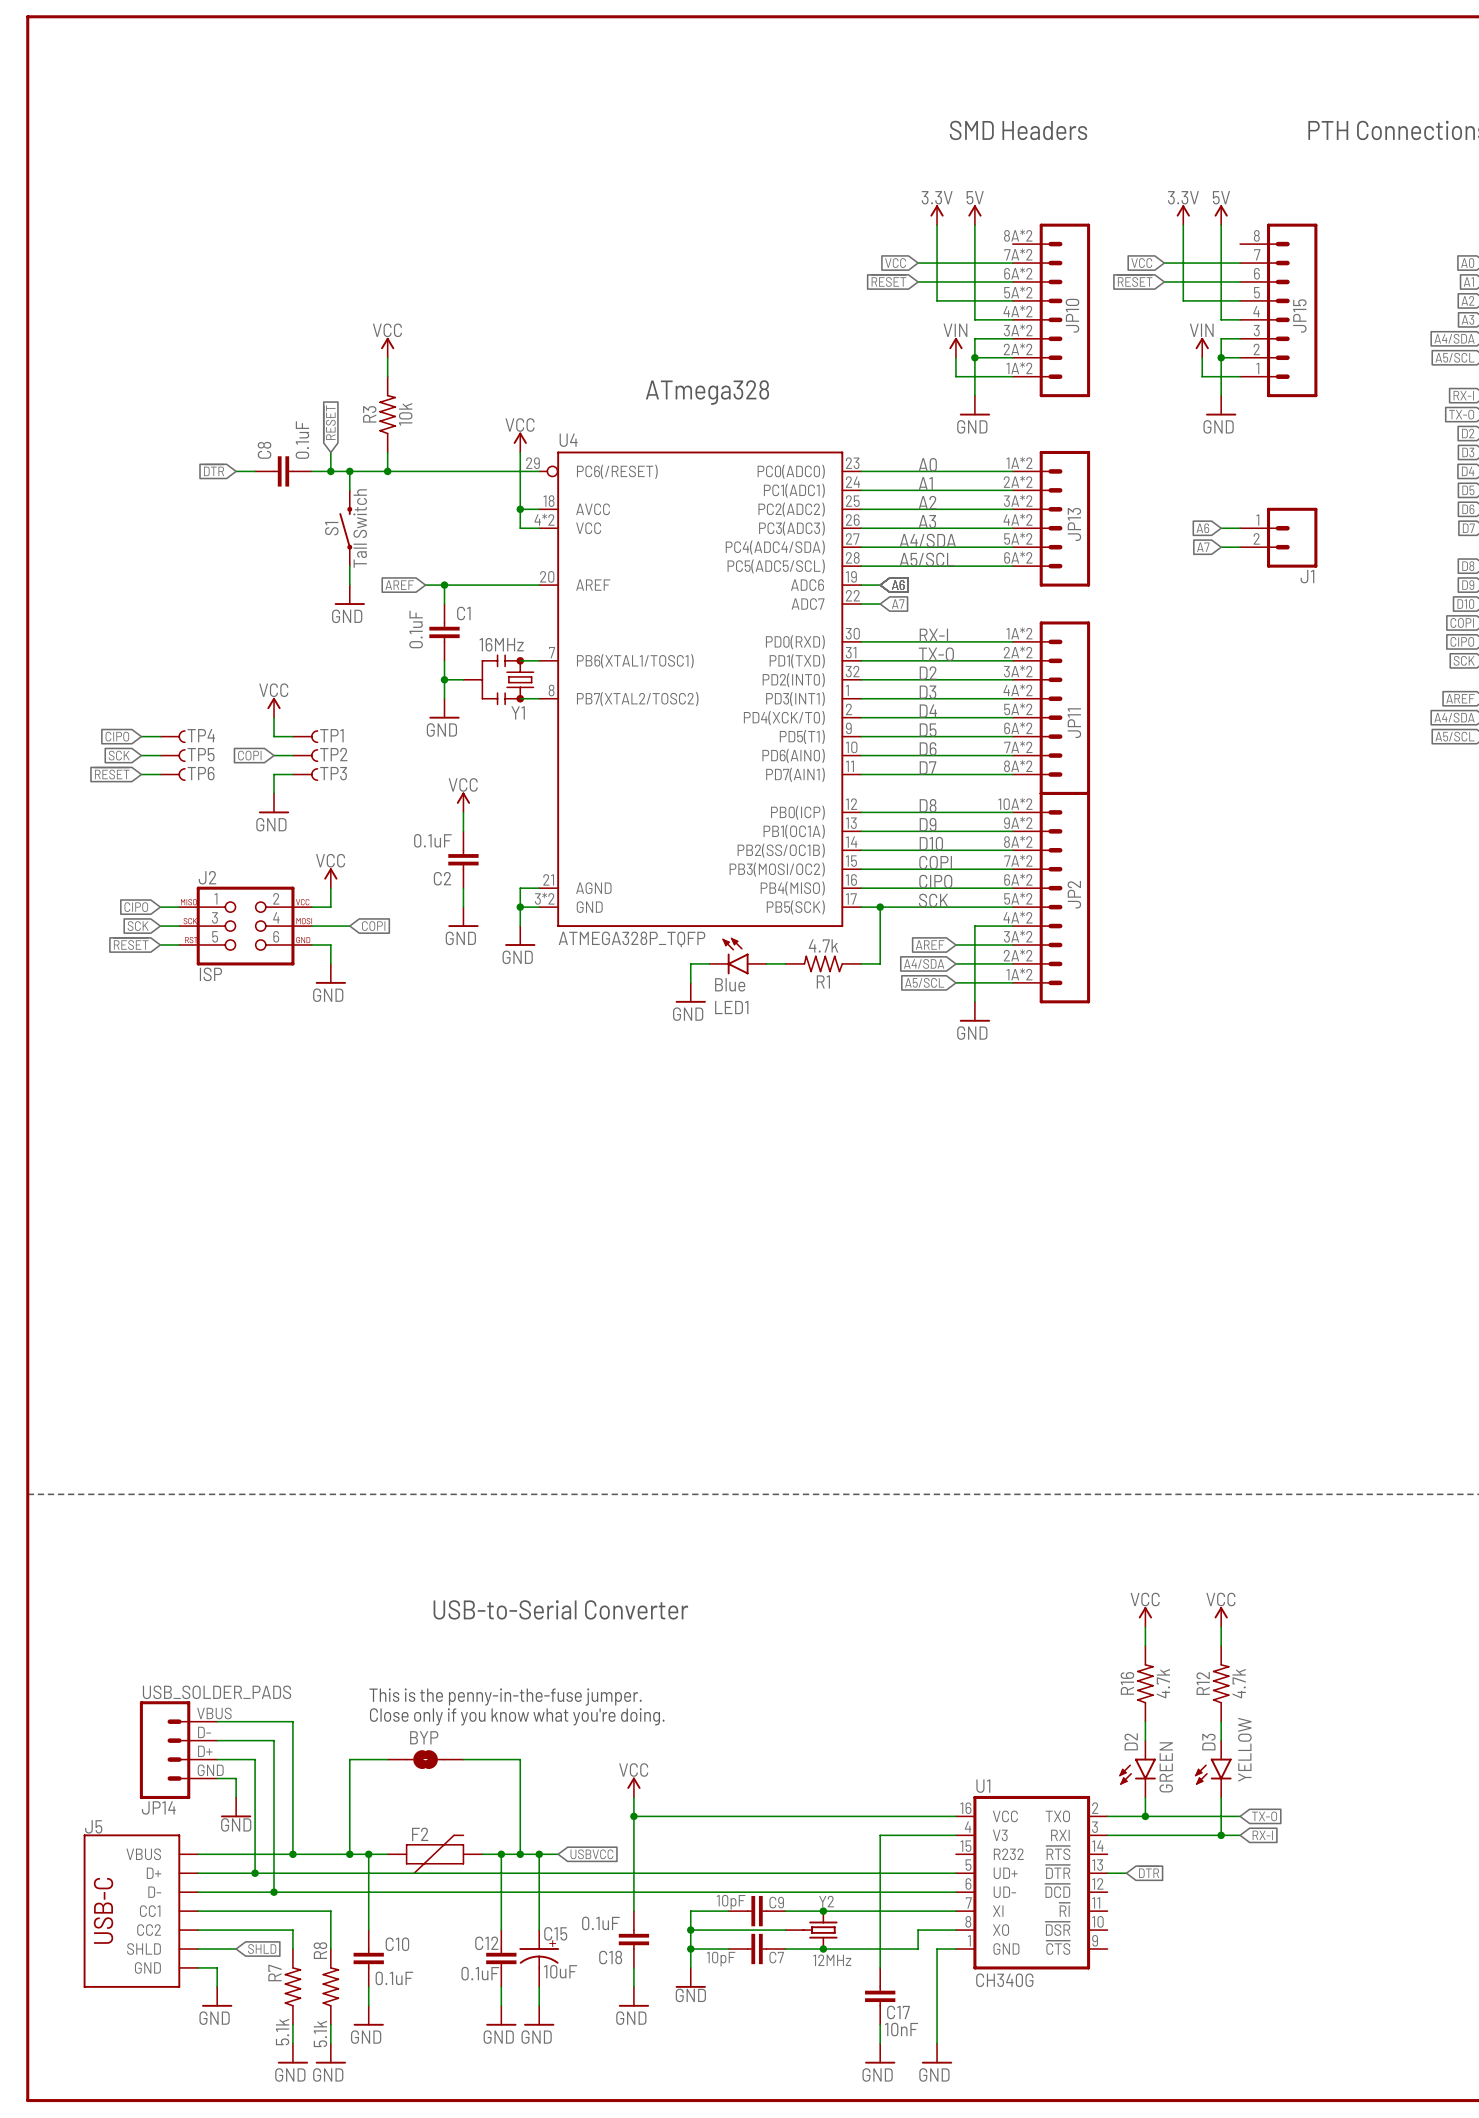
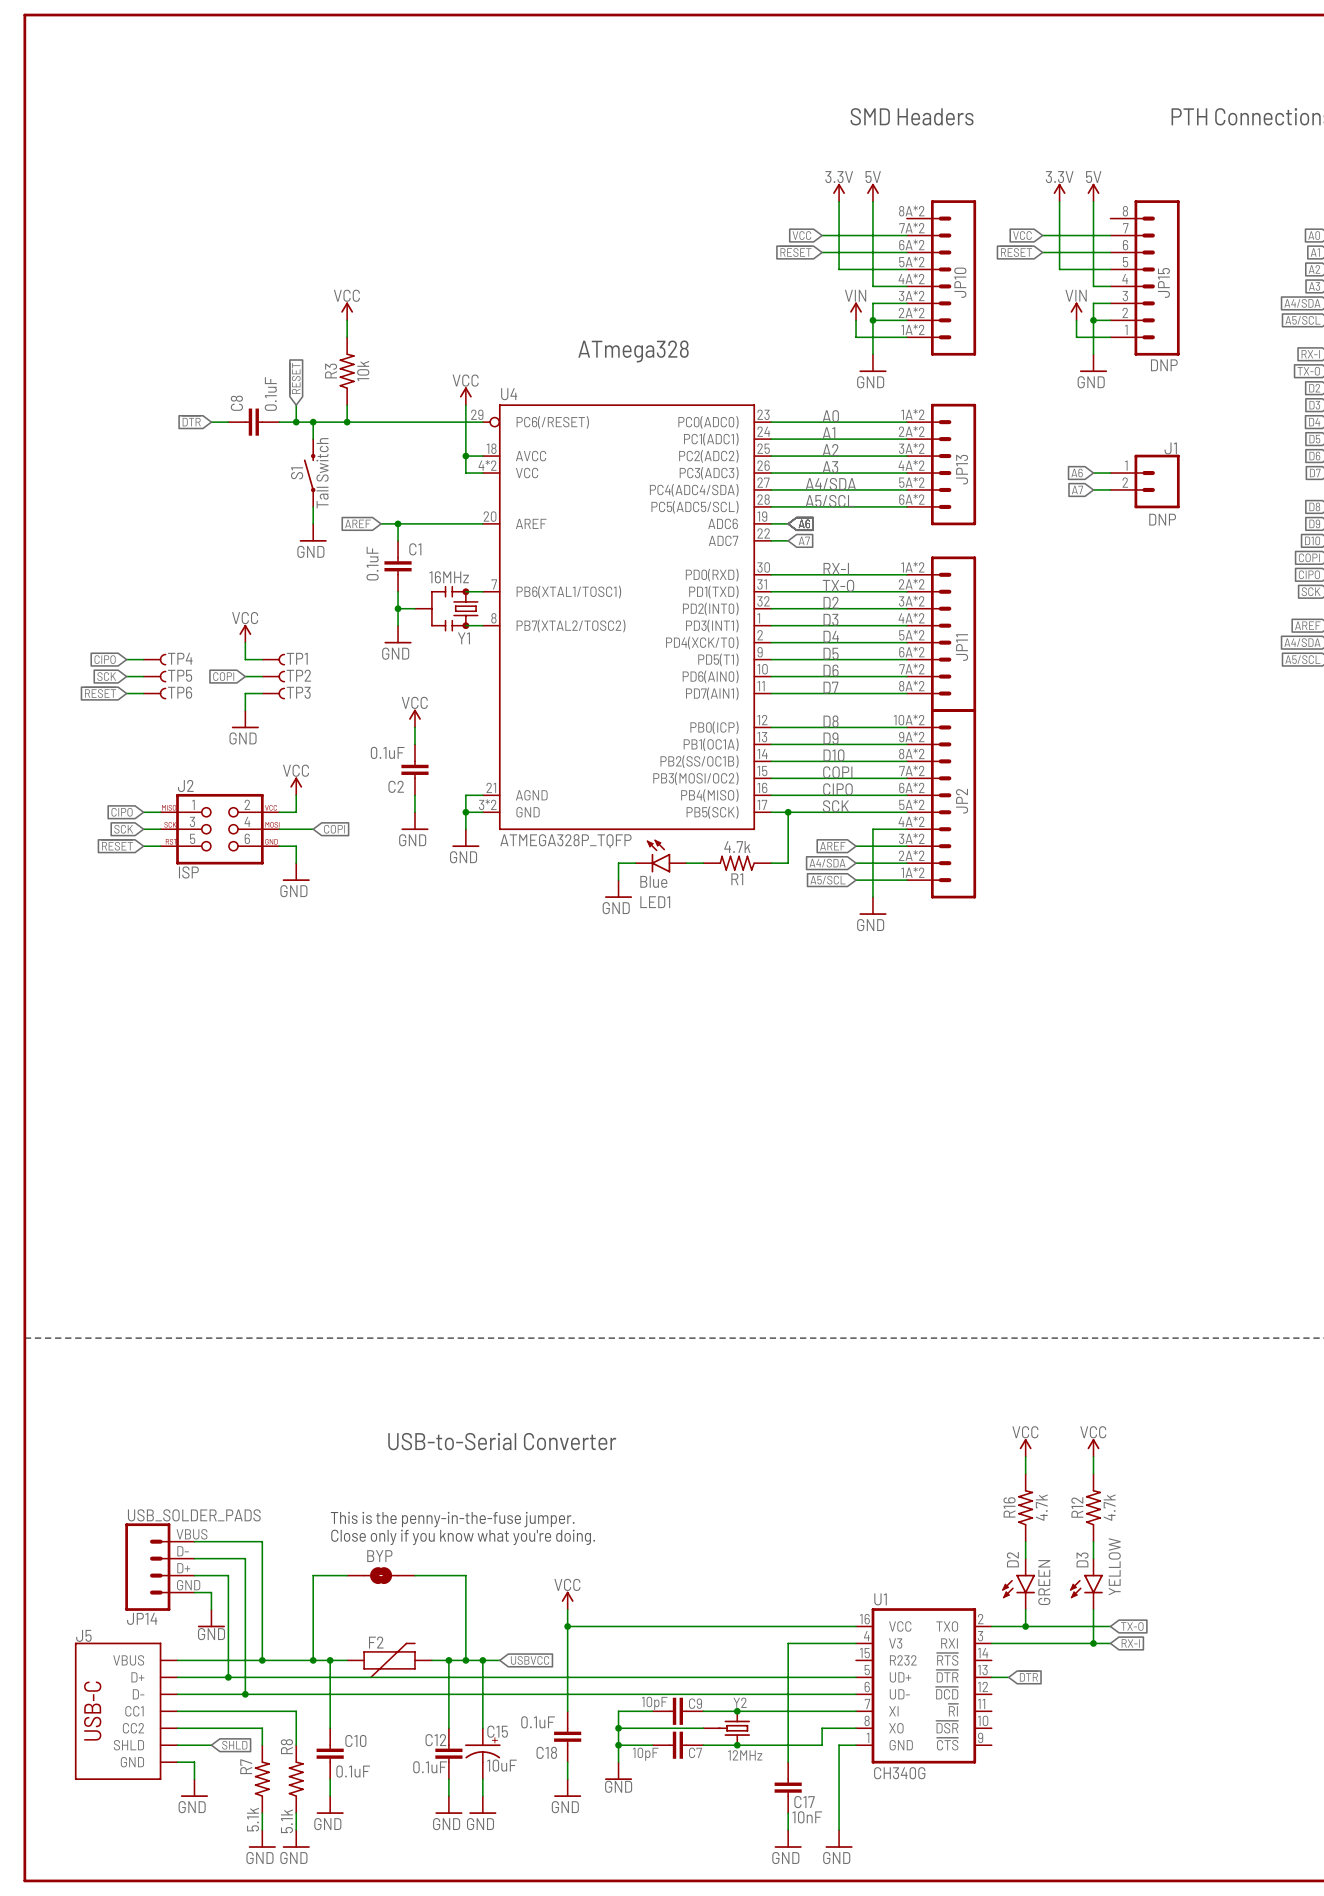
JP15 value: none -> DNP (1164, 365)
J1 name position: J1 (1307, 576) -> J1 (1170, 448)
J1 value: none -> DNP (1162, 519)

